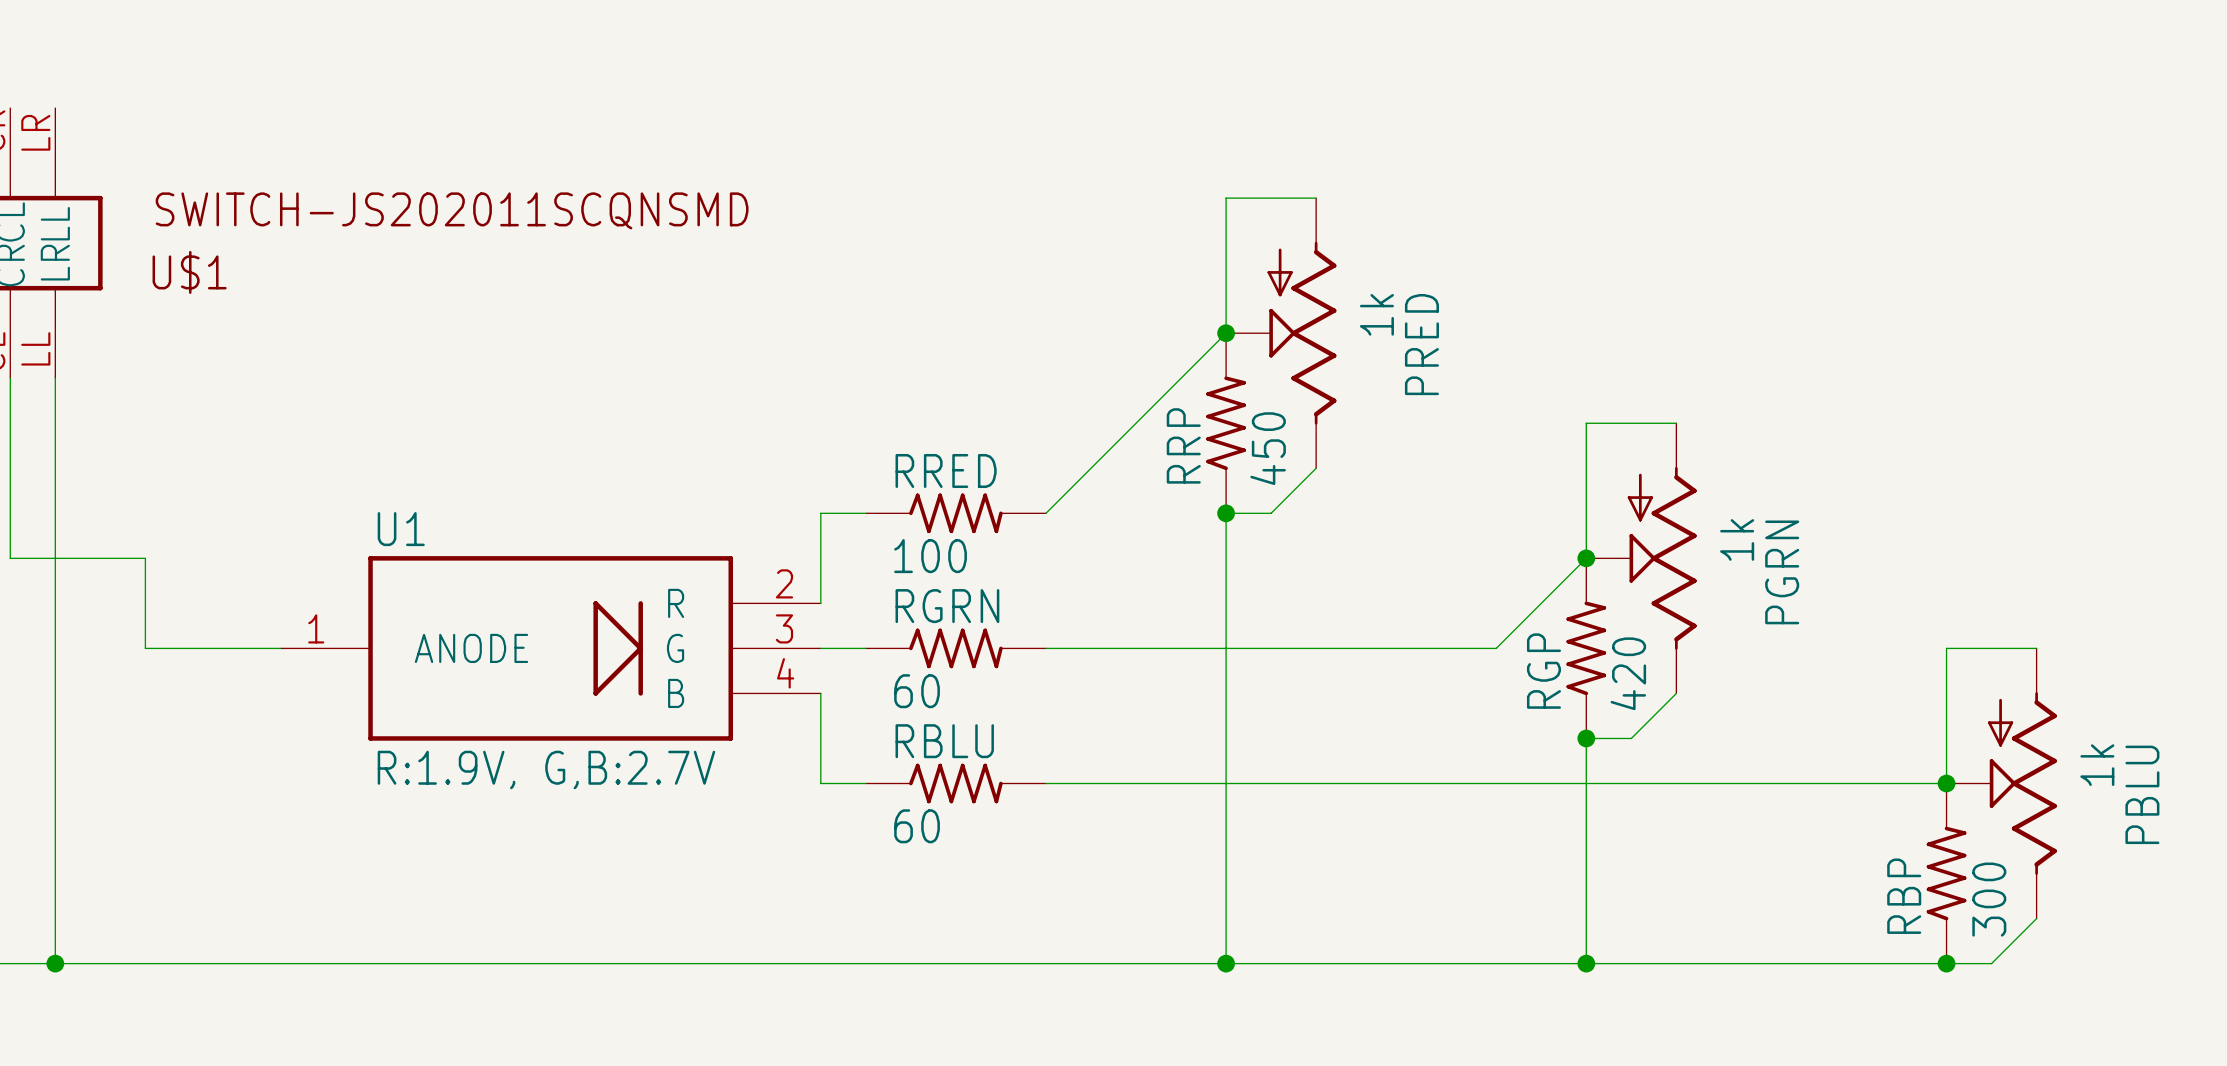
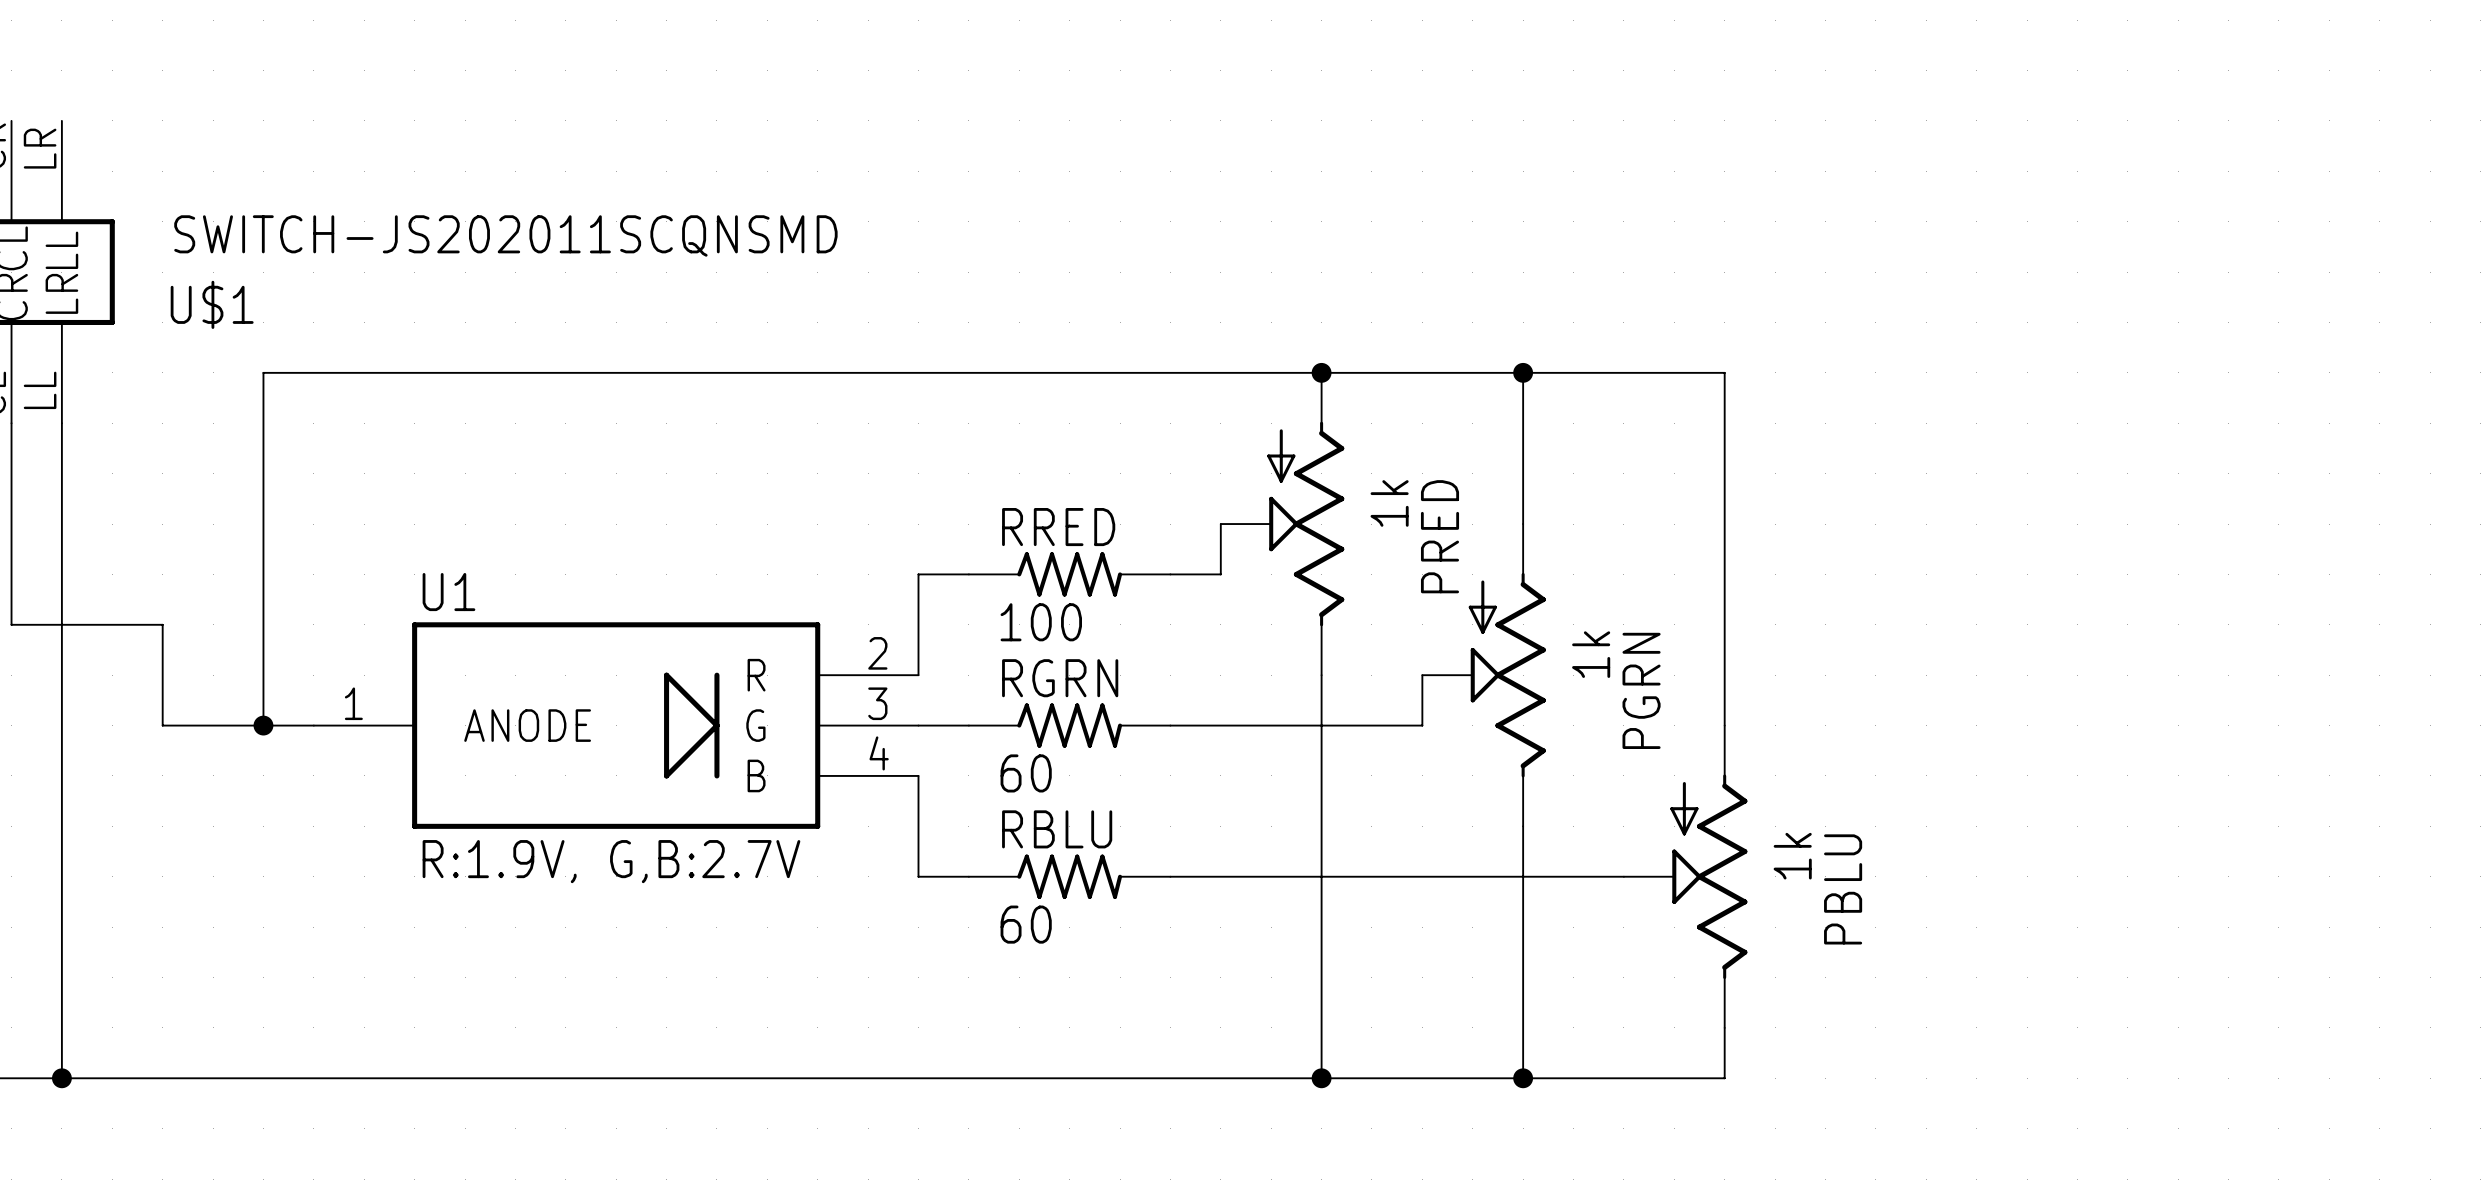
wire: (1316, 198) (1226, 198) (1226, 333) (1045, 513) -> (1220, 524) (1220, 574) (1170, 574)
junction position: (1226, 333) -> (1321, 372)
PRED position: (1281, 333) -> (1282, 524)
wire: none -> (1523, 372) (1523, 524)
junction: none -> (1523, 372)
RRP: 450 (1226, 423) -> none
wire: (1676, 423) (1586, 423) (1586, 558) (1496, 648) (1271, 648) -> (1422, 675) (1422, 725)
wire: (1316, 468) (1271, 513) (1226, 513) (1226, 963) -> none
junction: (1226, 513) -> none
junction: (1586, 558) -> none
PGRN position: (1641, 558) -> (1484, 675)
wire: none -> (1321, 675) (1321, 1078)
wire: none -> (263, 725) (263, 372) (1724, 372) (1724, 725)
junction: none -> (263, 725)
RGP: 420 (1586, 648) -> none
wire: (2036, 648) (1946, 648) (1946, 783) (1451, 783) -> none
wire: (1676, 693) (1631, 738) (1586, 738) (1586, 963) -> none
wire: none -> (1523, 826) (1523, 1078)
junction: (1586, 738) -> none
PBLU: none -> 1k (1685, 876)
junction: (1946, 783) -> none
PBLU: 1k (2001, 783) -> none
RBP: 300 (1946, 873) -> none
wire: (2036, 918) (1991, 963) (1541, 963) -> (1724, 1027) (1724, 1078)
junction position: (1226, 963) -> (1321, 1078)
junction: none -> (1523, 1078)
junction: (1586, 963) -> none
junction: (1946, 963) -> none

